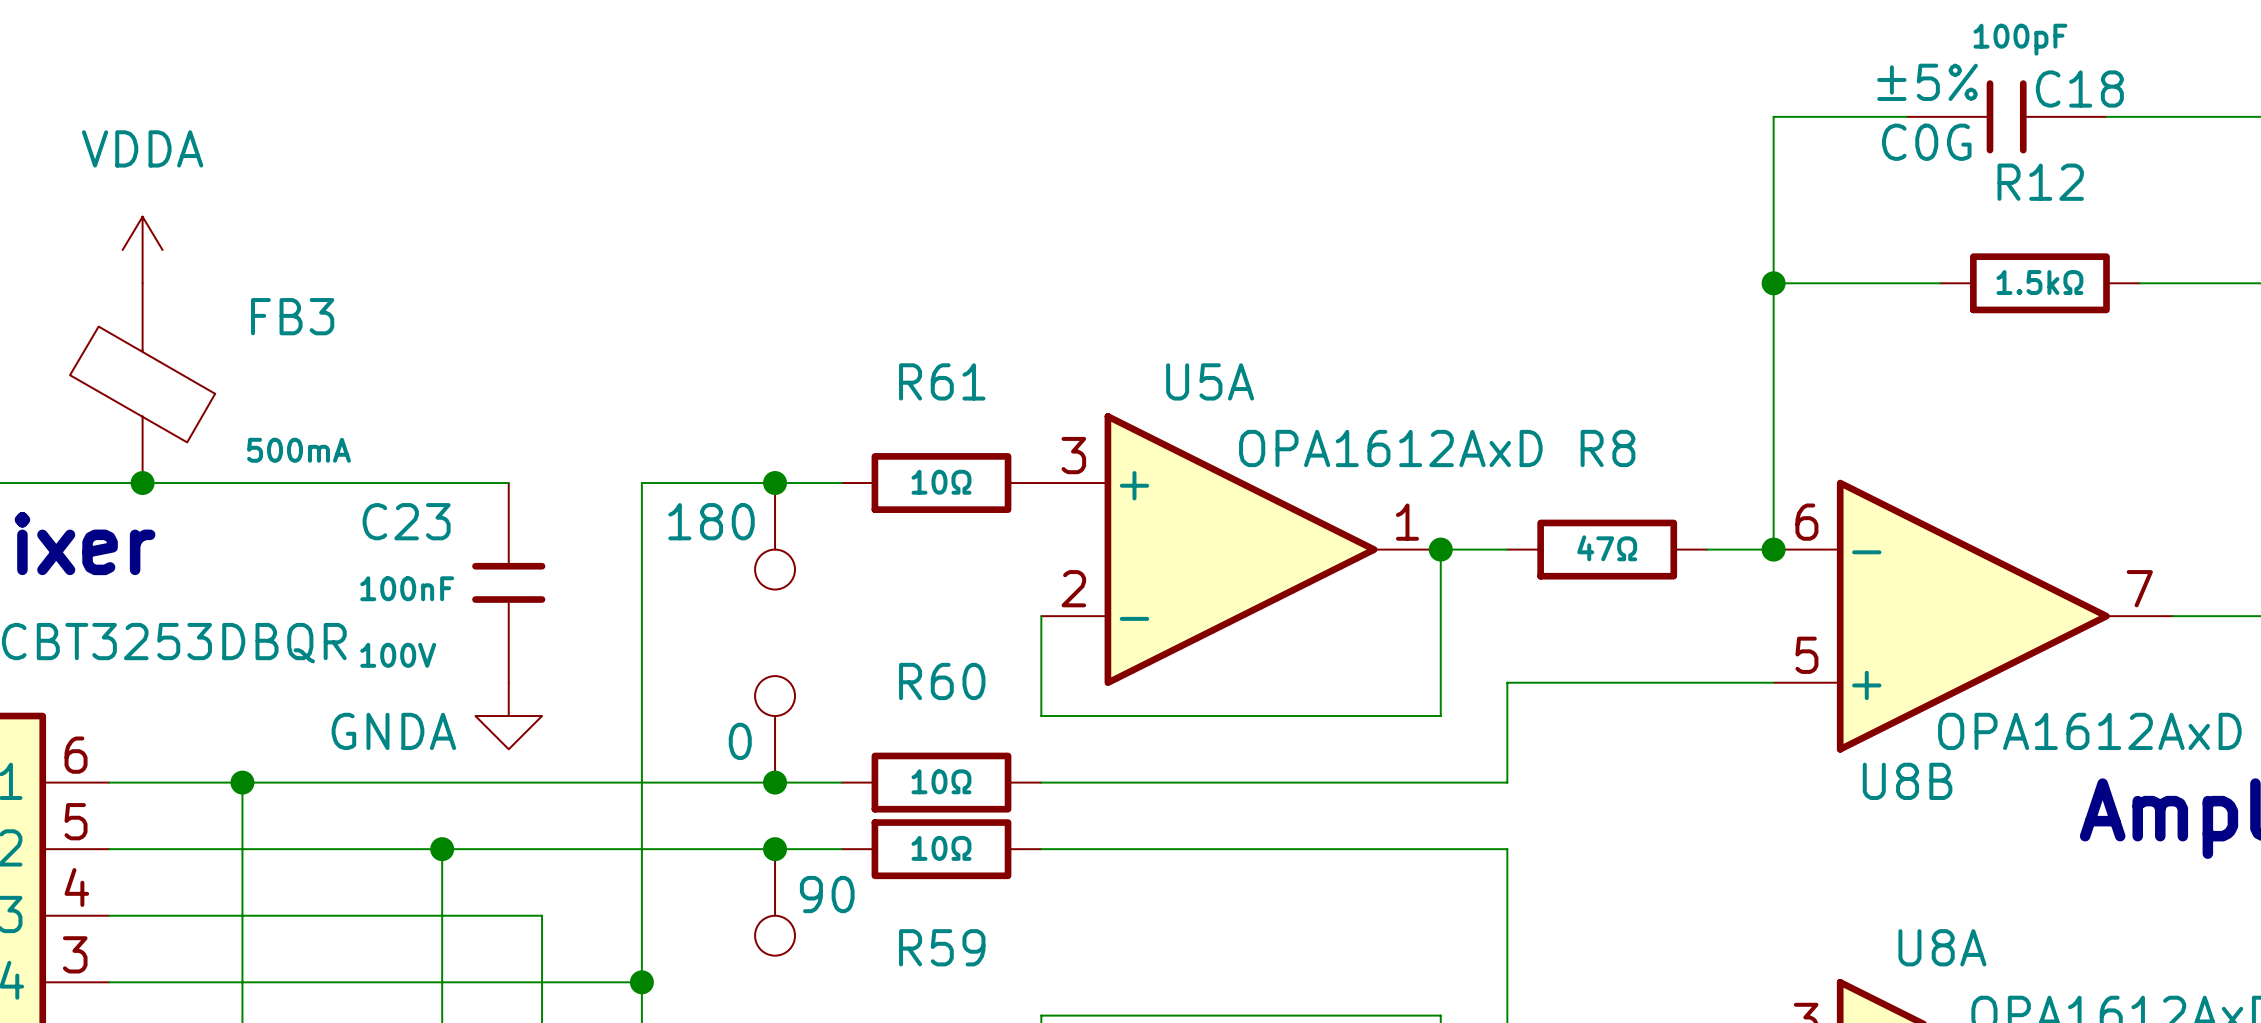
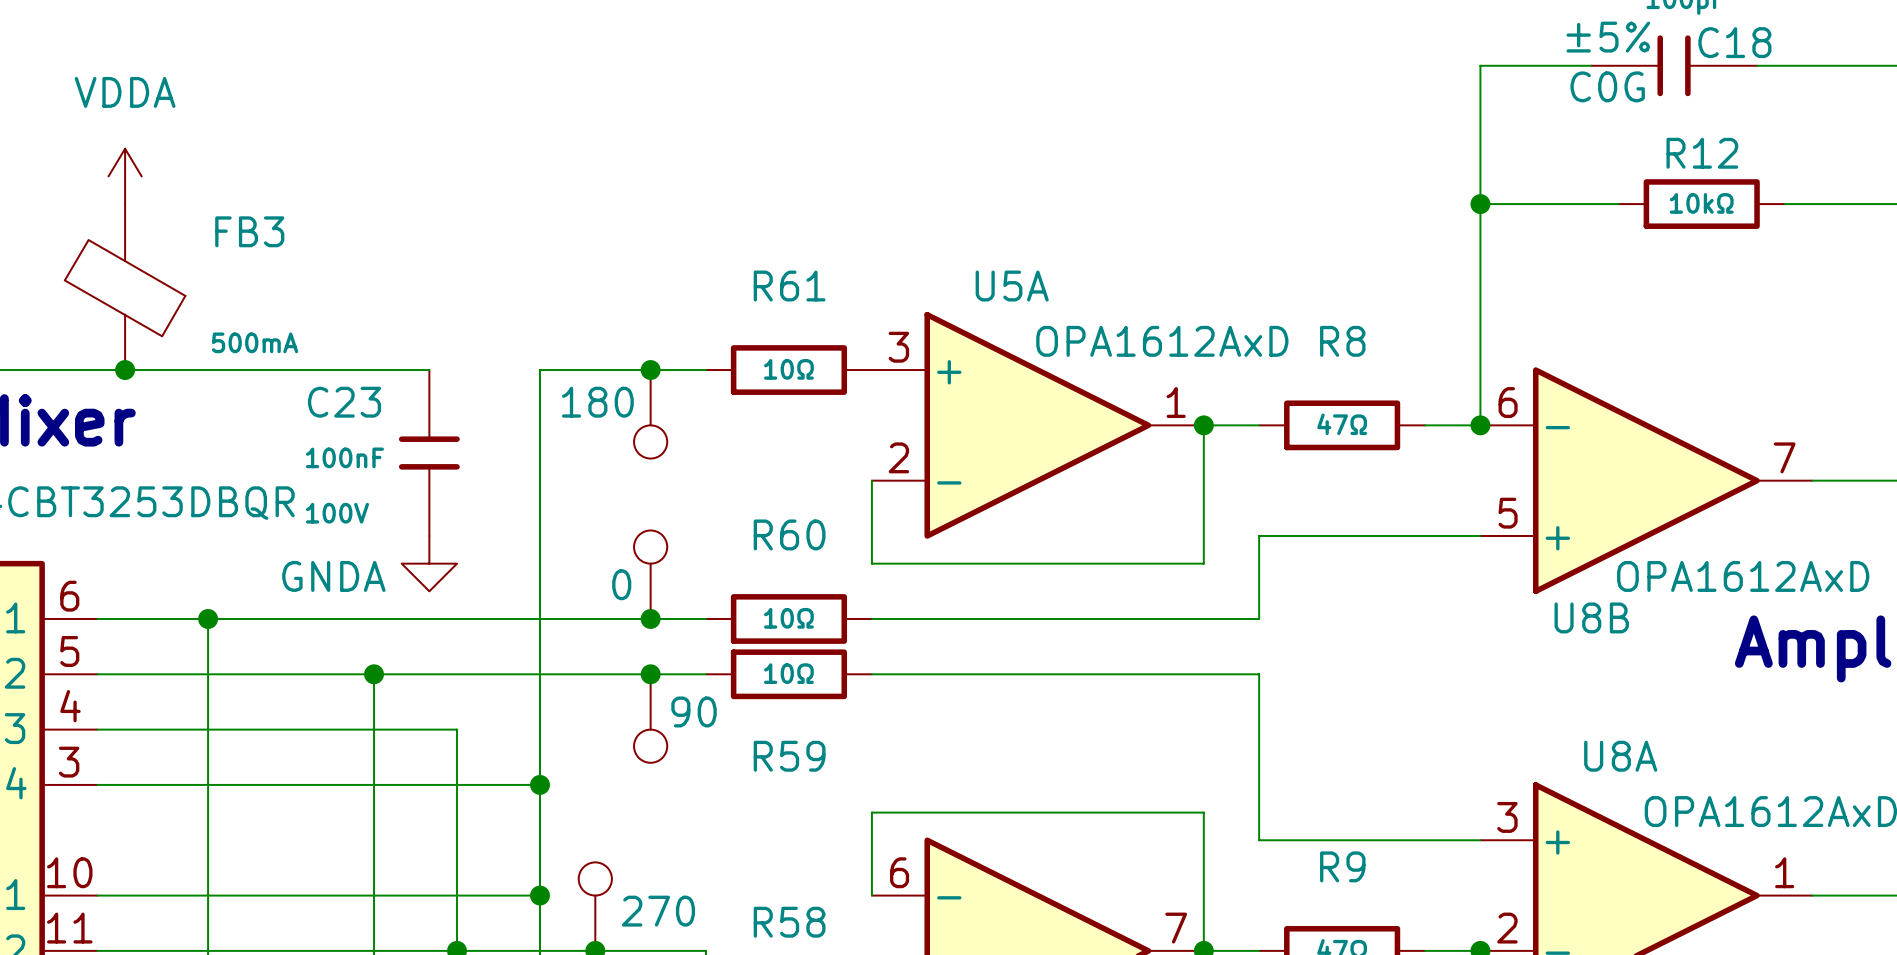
R12 name position: R12 (2040, 182) -> R12 (1702, 153)
R12 value: 1.5kΩ (2039, 282) -> 10kΩ (1701, 203)

